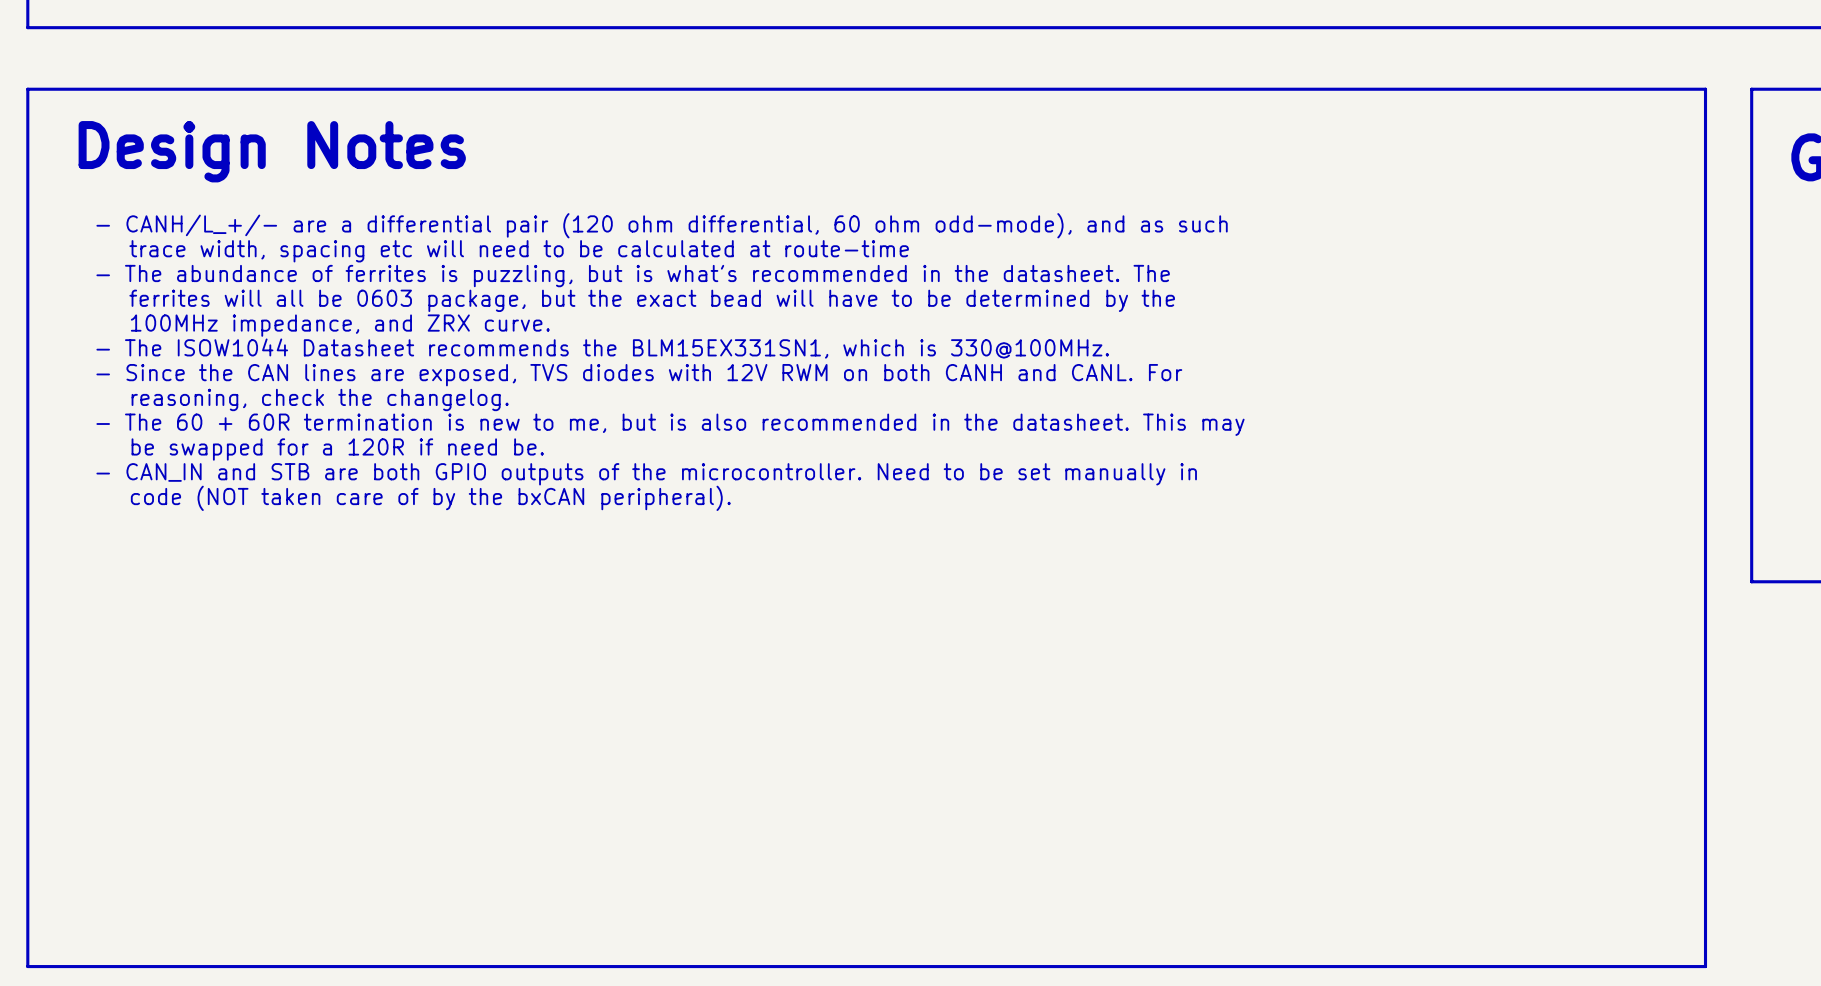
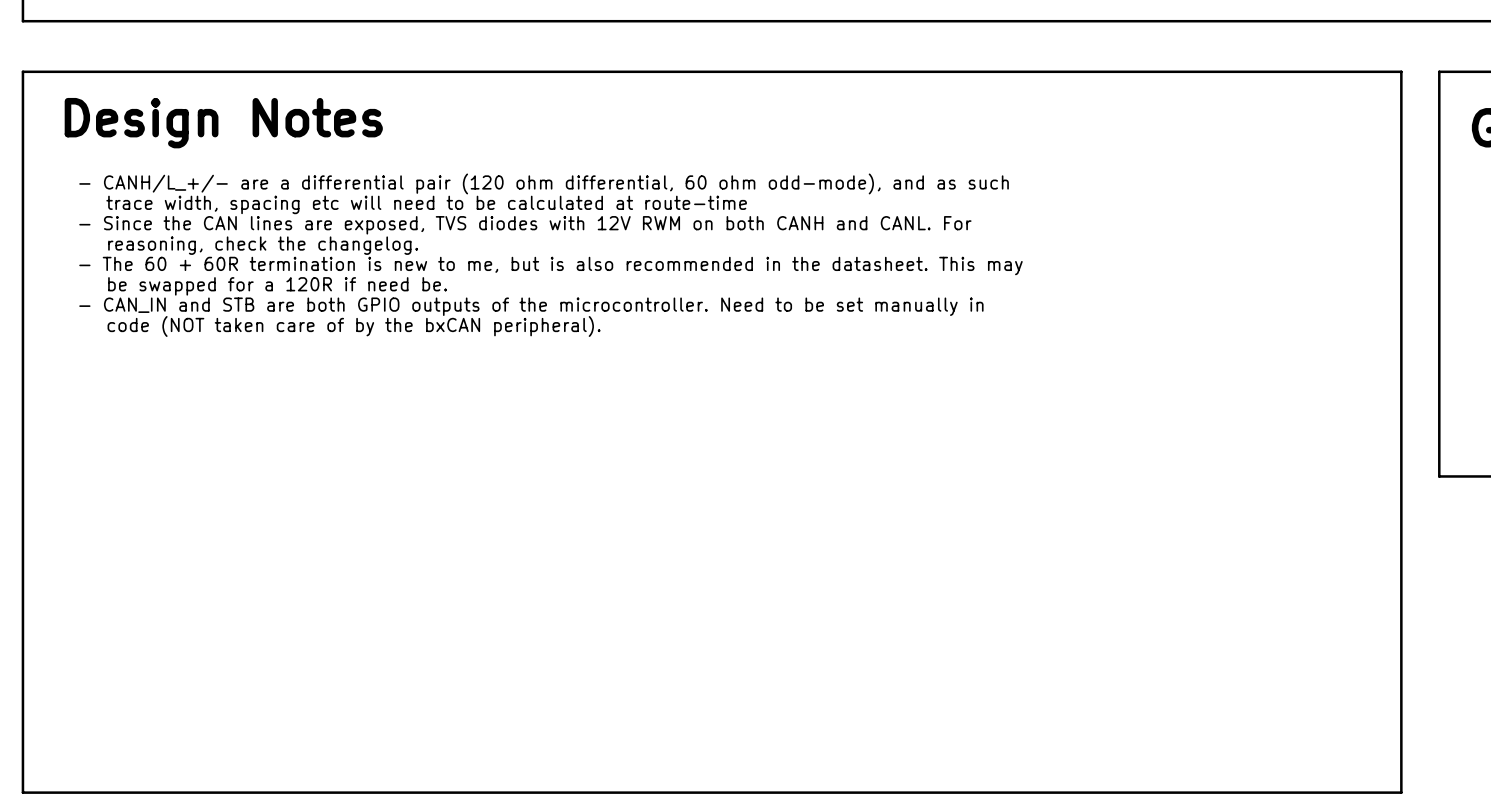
text: - The abundance of ferrites is puzzling, but is what's recommended in the datasheet. The (633, 276) -> - Since the CAN lines are exposed, TVS diodes with 12V RWM on both CANH and CANL. For (525, 225)
text: ferrites will all be 0603 package, but the exact bead will have to be determined by the (652, 300) -> reasoning, check the changelog. (263, 245)
text: 100MHz impedance, and ZRX curve. (340, 325) -> - The 60 + 60R termination is new to me, but is also recommended in the datasheet. This may (550, 266)
text: - The ISOW1044 Datasheet recommends the BLM15EX331SN1, which is 330@100MHz. (602, 348) -> be swapped for a 120R if need be. (277, 286)
text: - Since the CAN lines are exposed, TVS diodes with 12V RWM on both CANH and CANL. For (639, 375) -> - CAN_IN and STB are both GPIO outputs of the microcontroller. Need to be set manually in (531, 306)
text: reasoning, check the changelog. (320, 399) -> code (NOT taken care of by the bxCAN peripheral). (354, 326)
text: - The 60 + 60R termination is new to me, but is also recommended in the datasheet. This may (670, 424) -> none
text: be swapped for a 120R if need be. (337, 449) -> none
text: - CAN_IN and STB are both GPIO outputs of the microcontroller. Need to be set manually in (646, 474) -> none
text: code (NOT taken care of by the bxCAN peripheral). (430, 498) -> none

